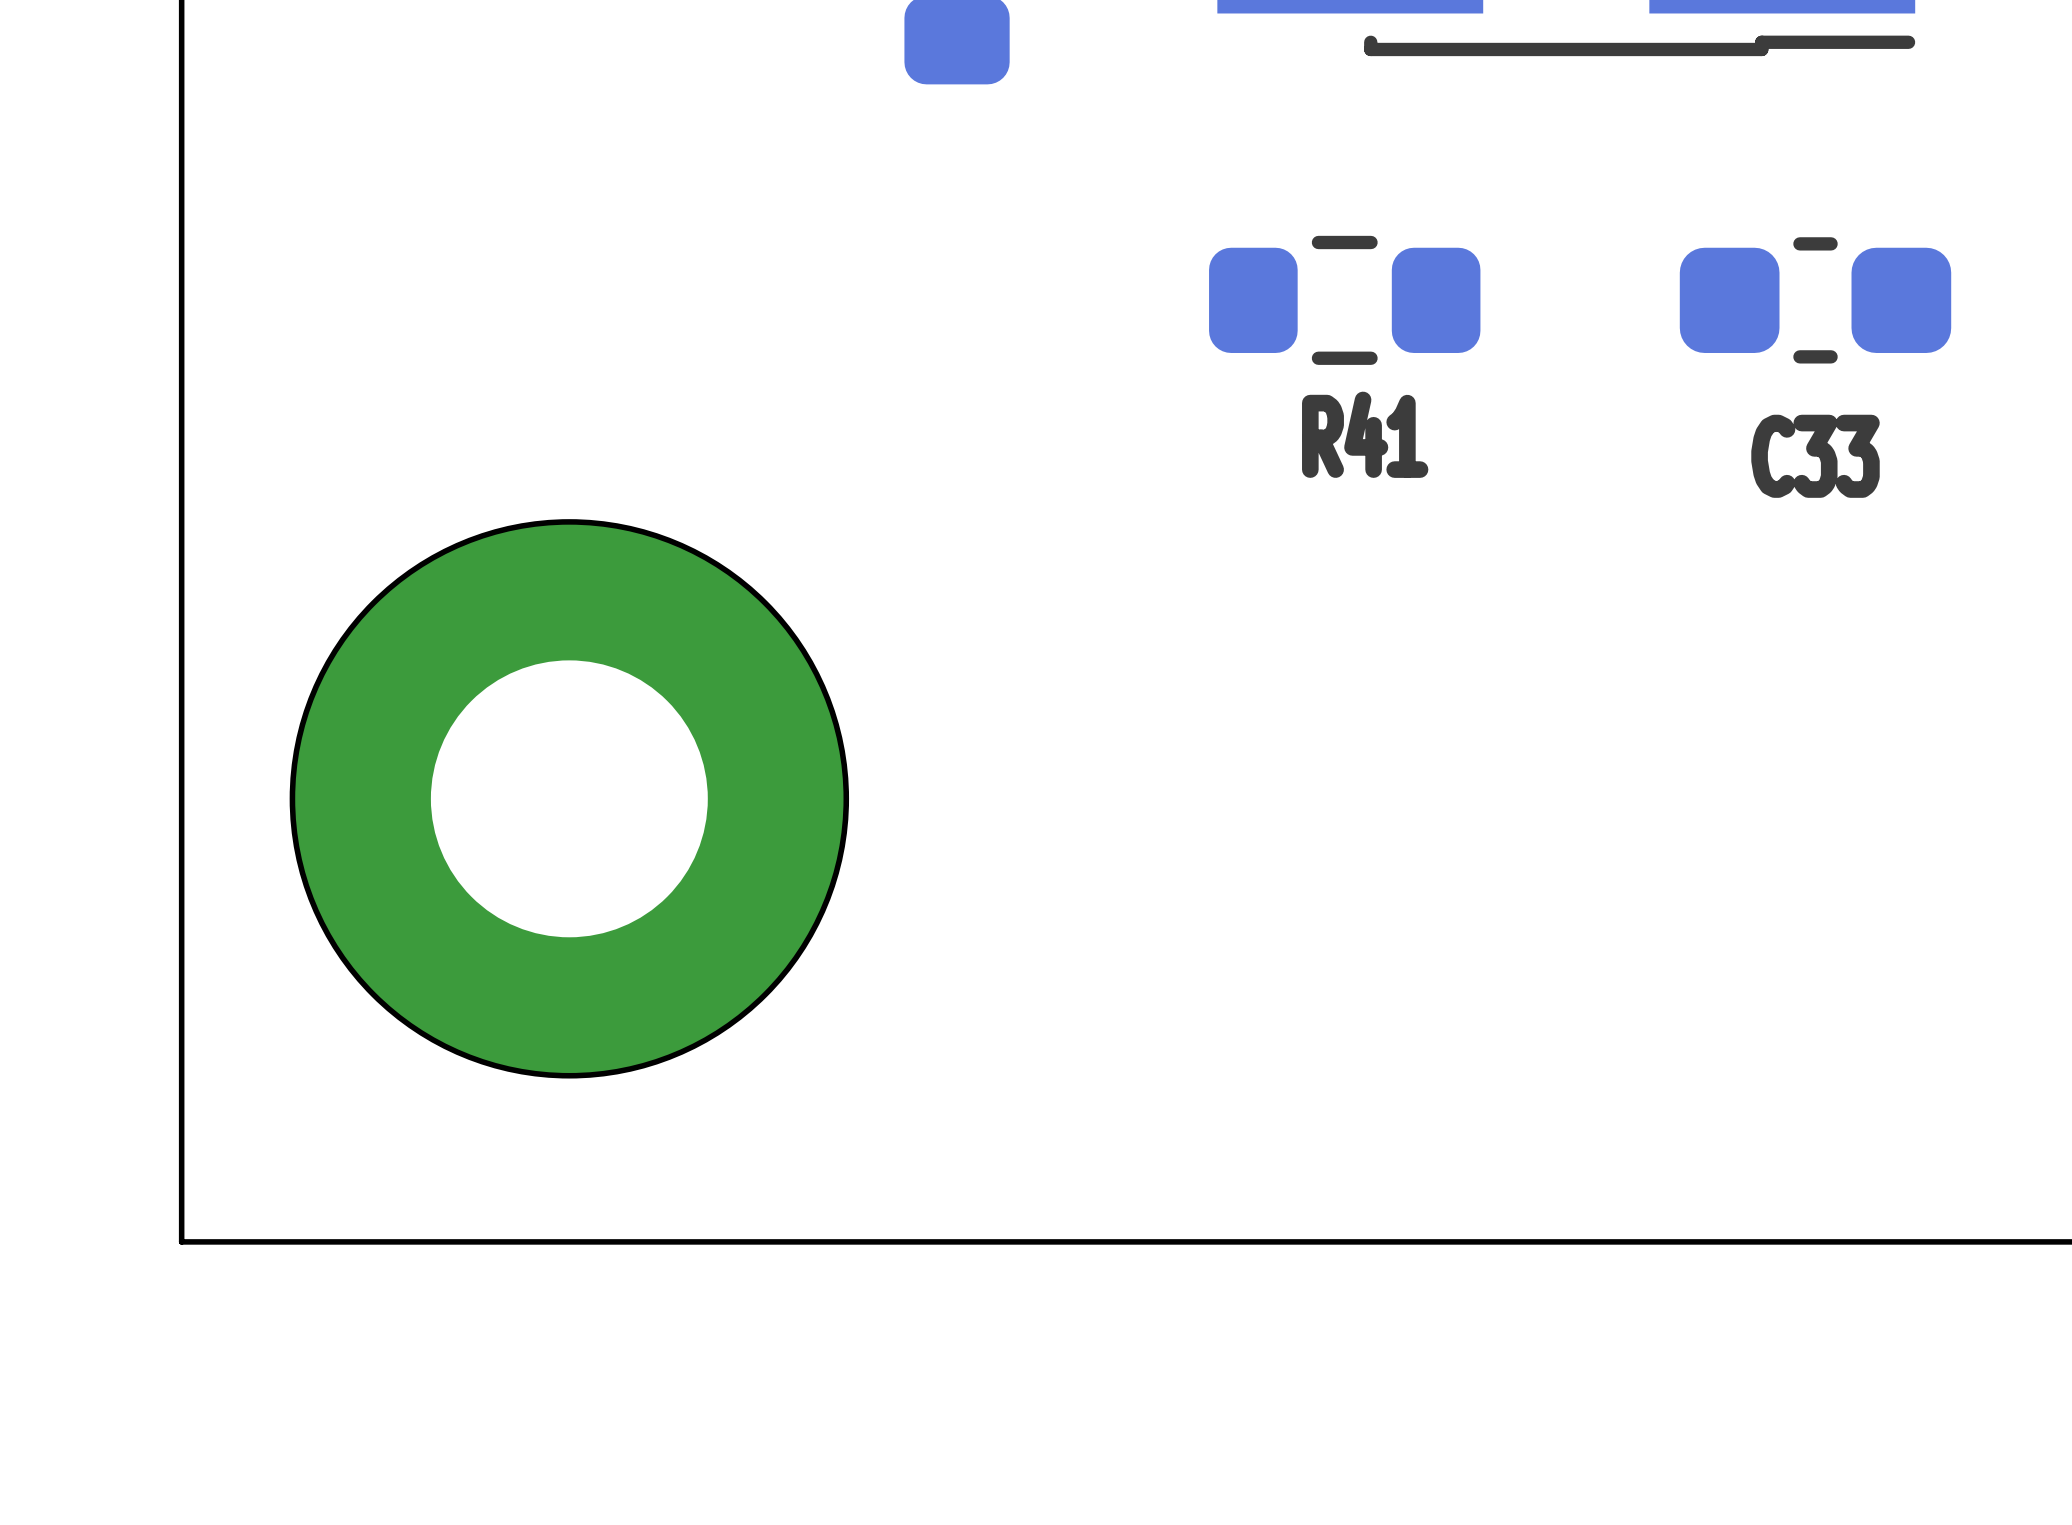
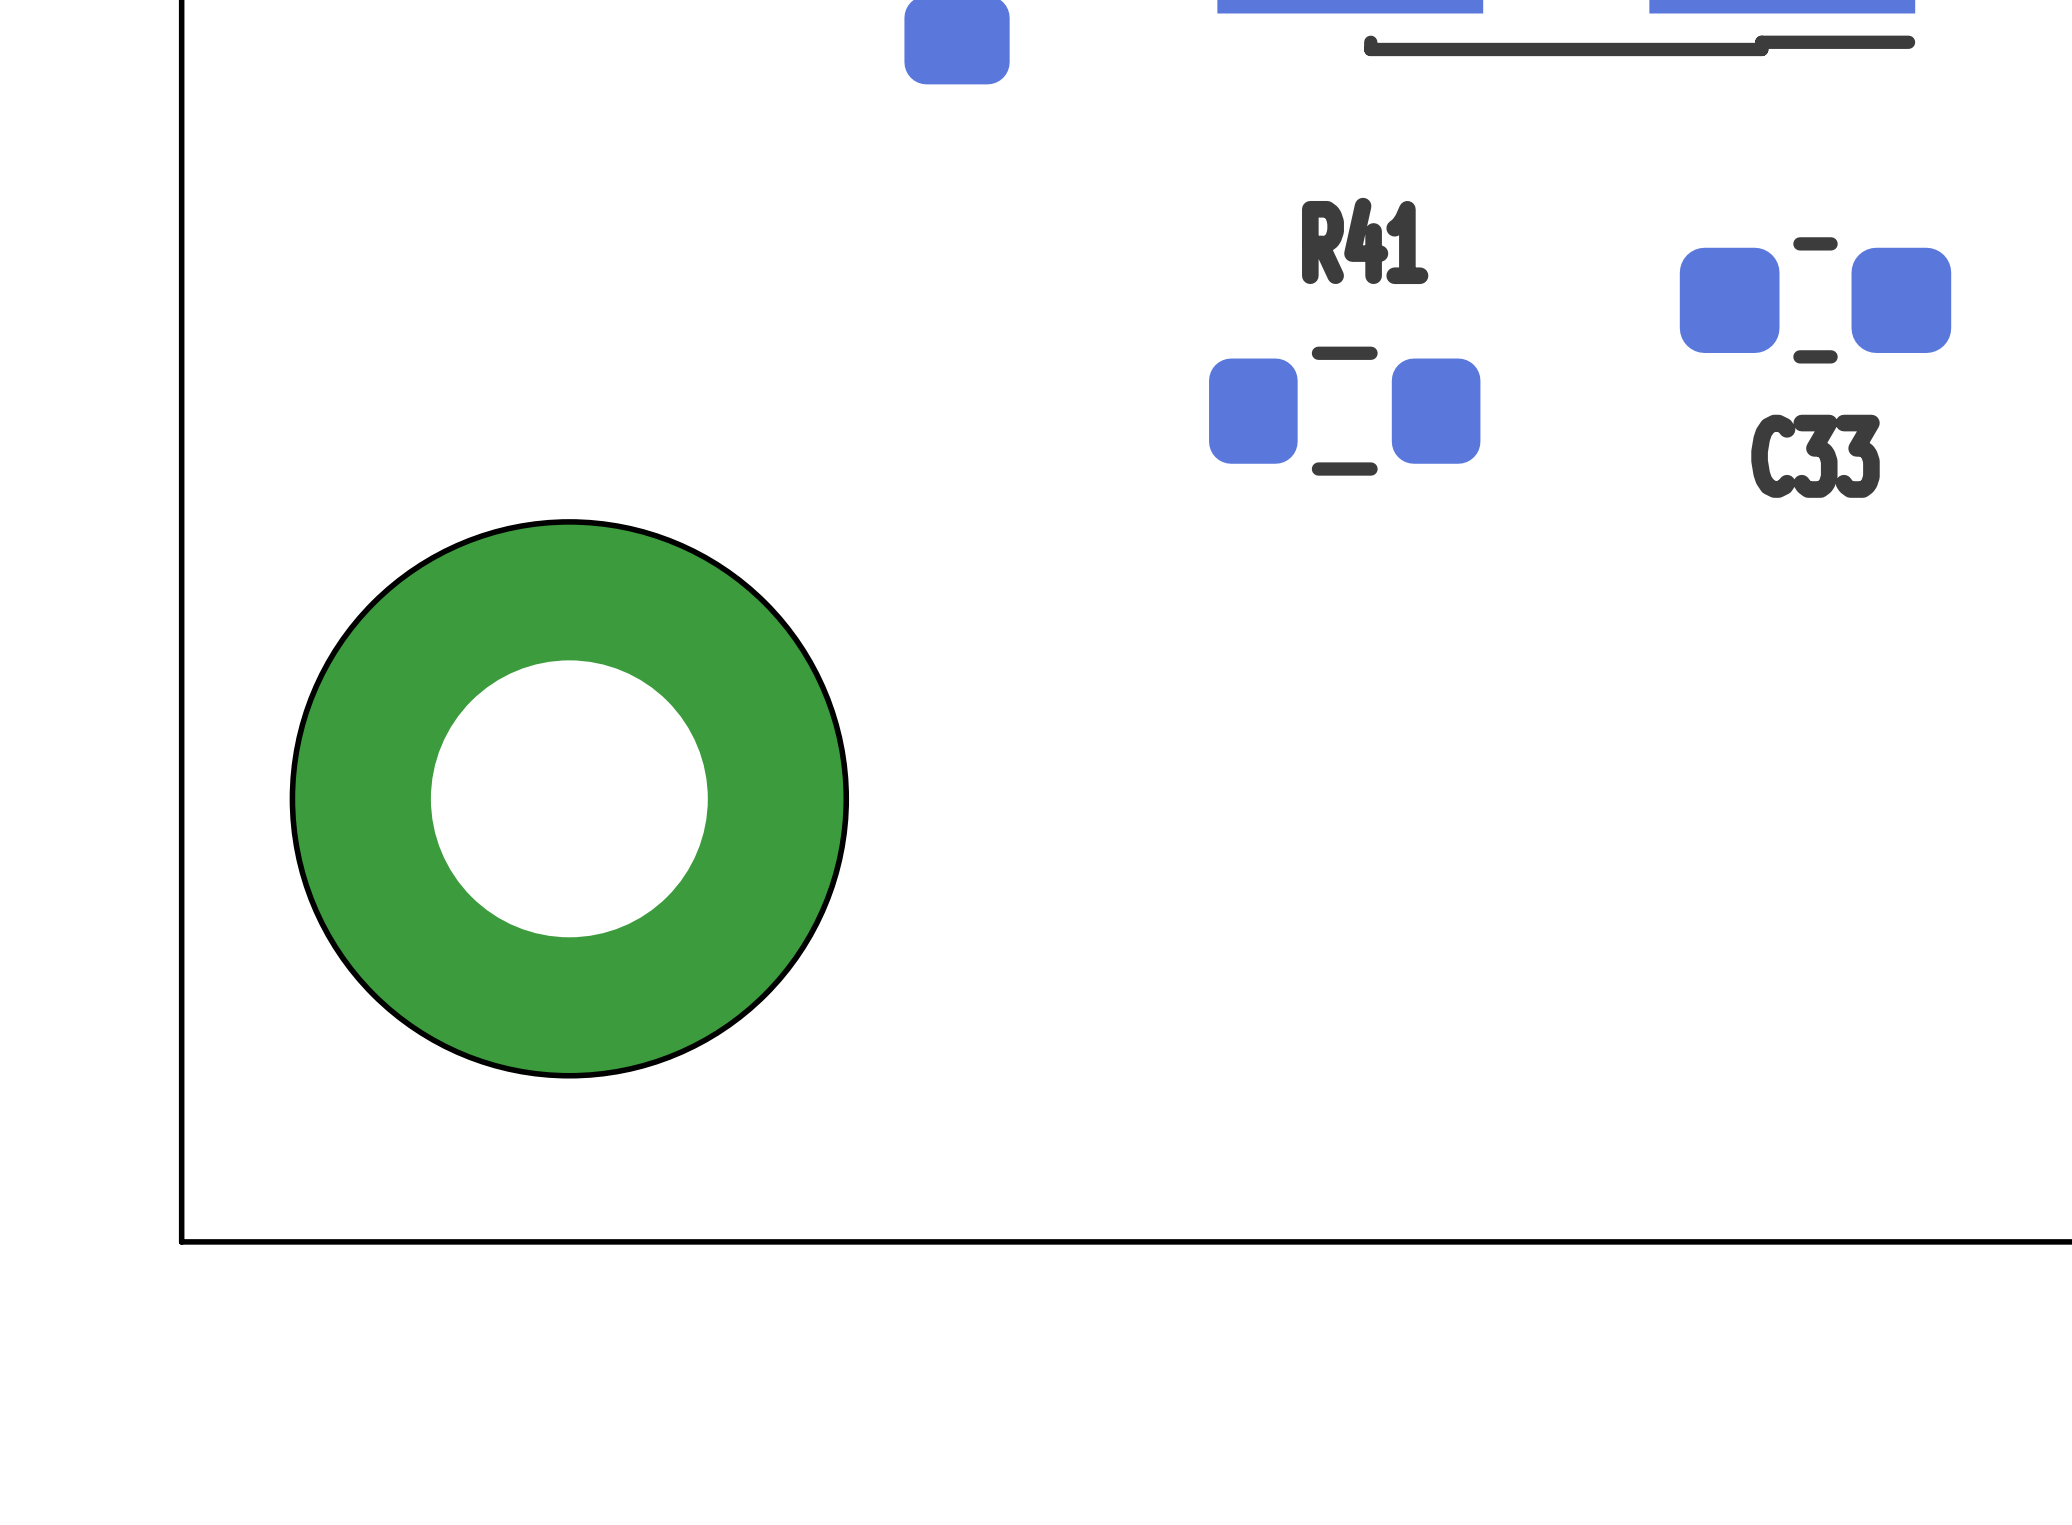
R41 position: (1344, 300) -> (1344, 411)
R41 name position: R41 (1365, 434) -> R41 (1365, 240)

